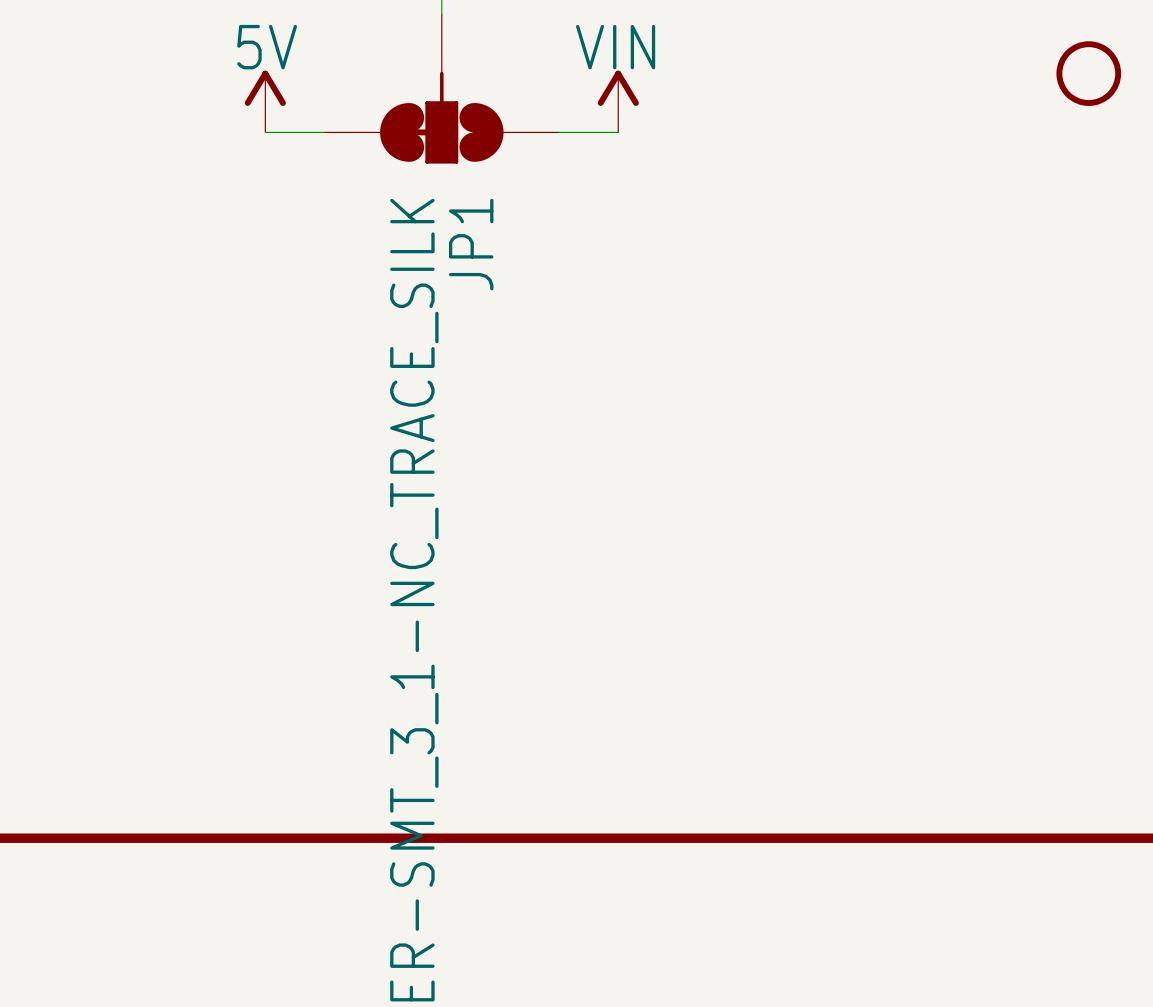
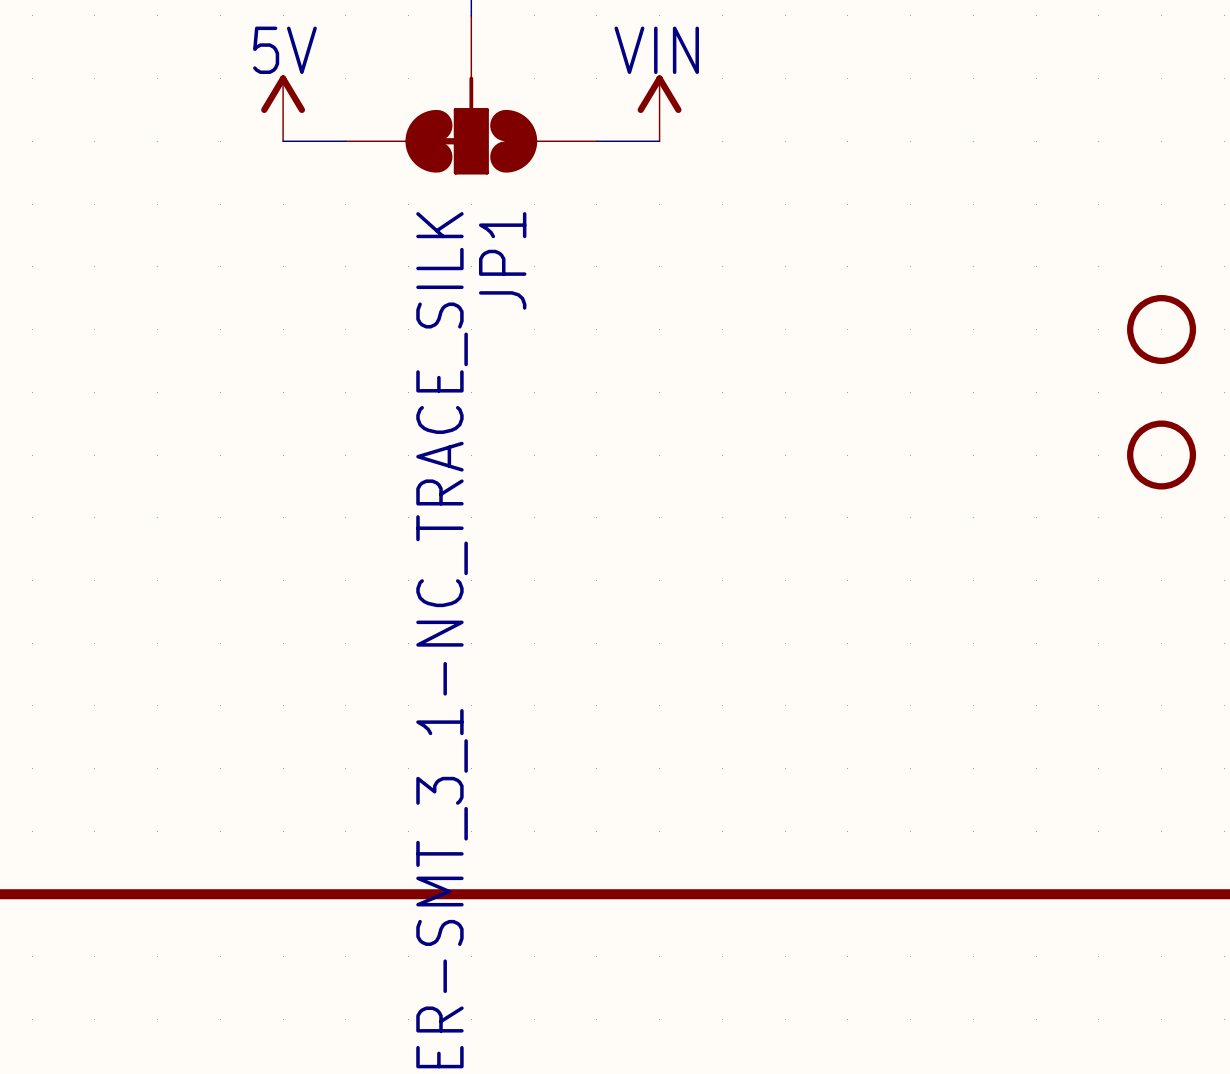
part: (1088, 73) -> none
part: none -> (1161, 329)
part: none -> (1161, 455)

